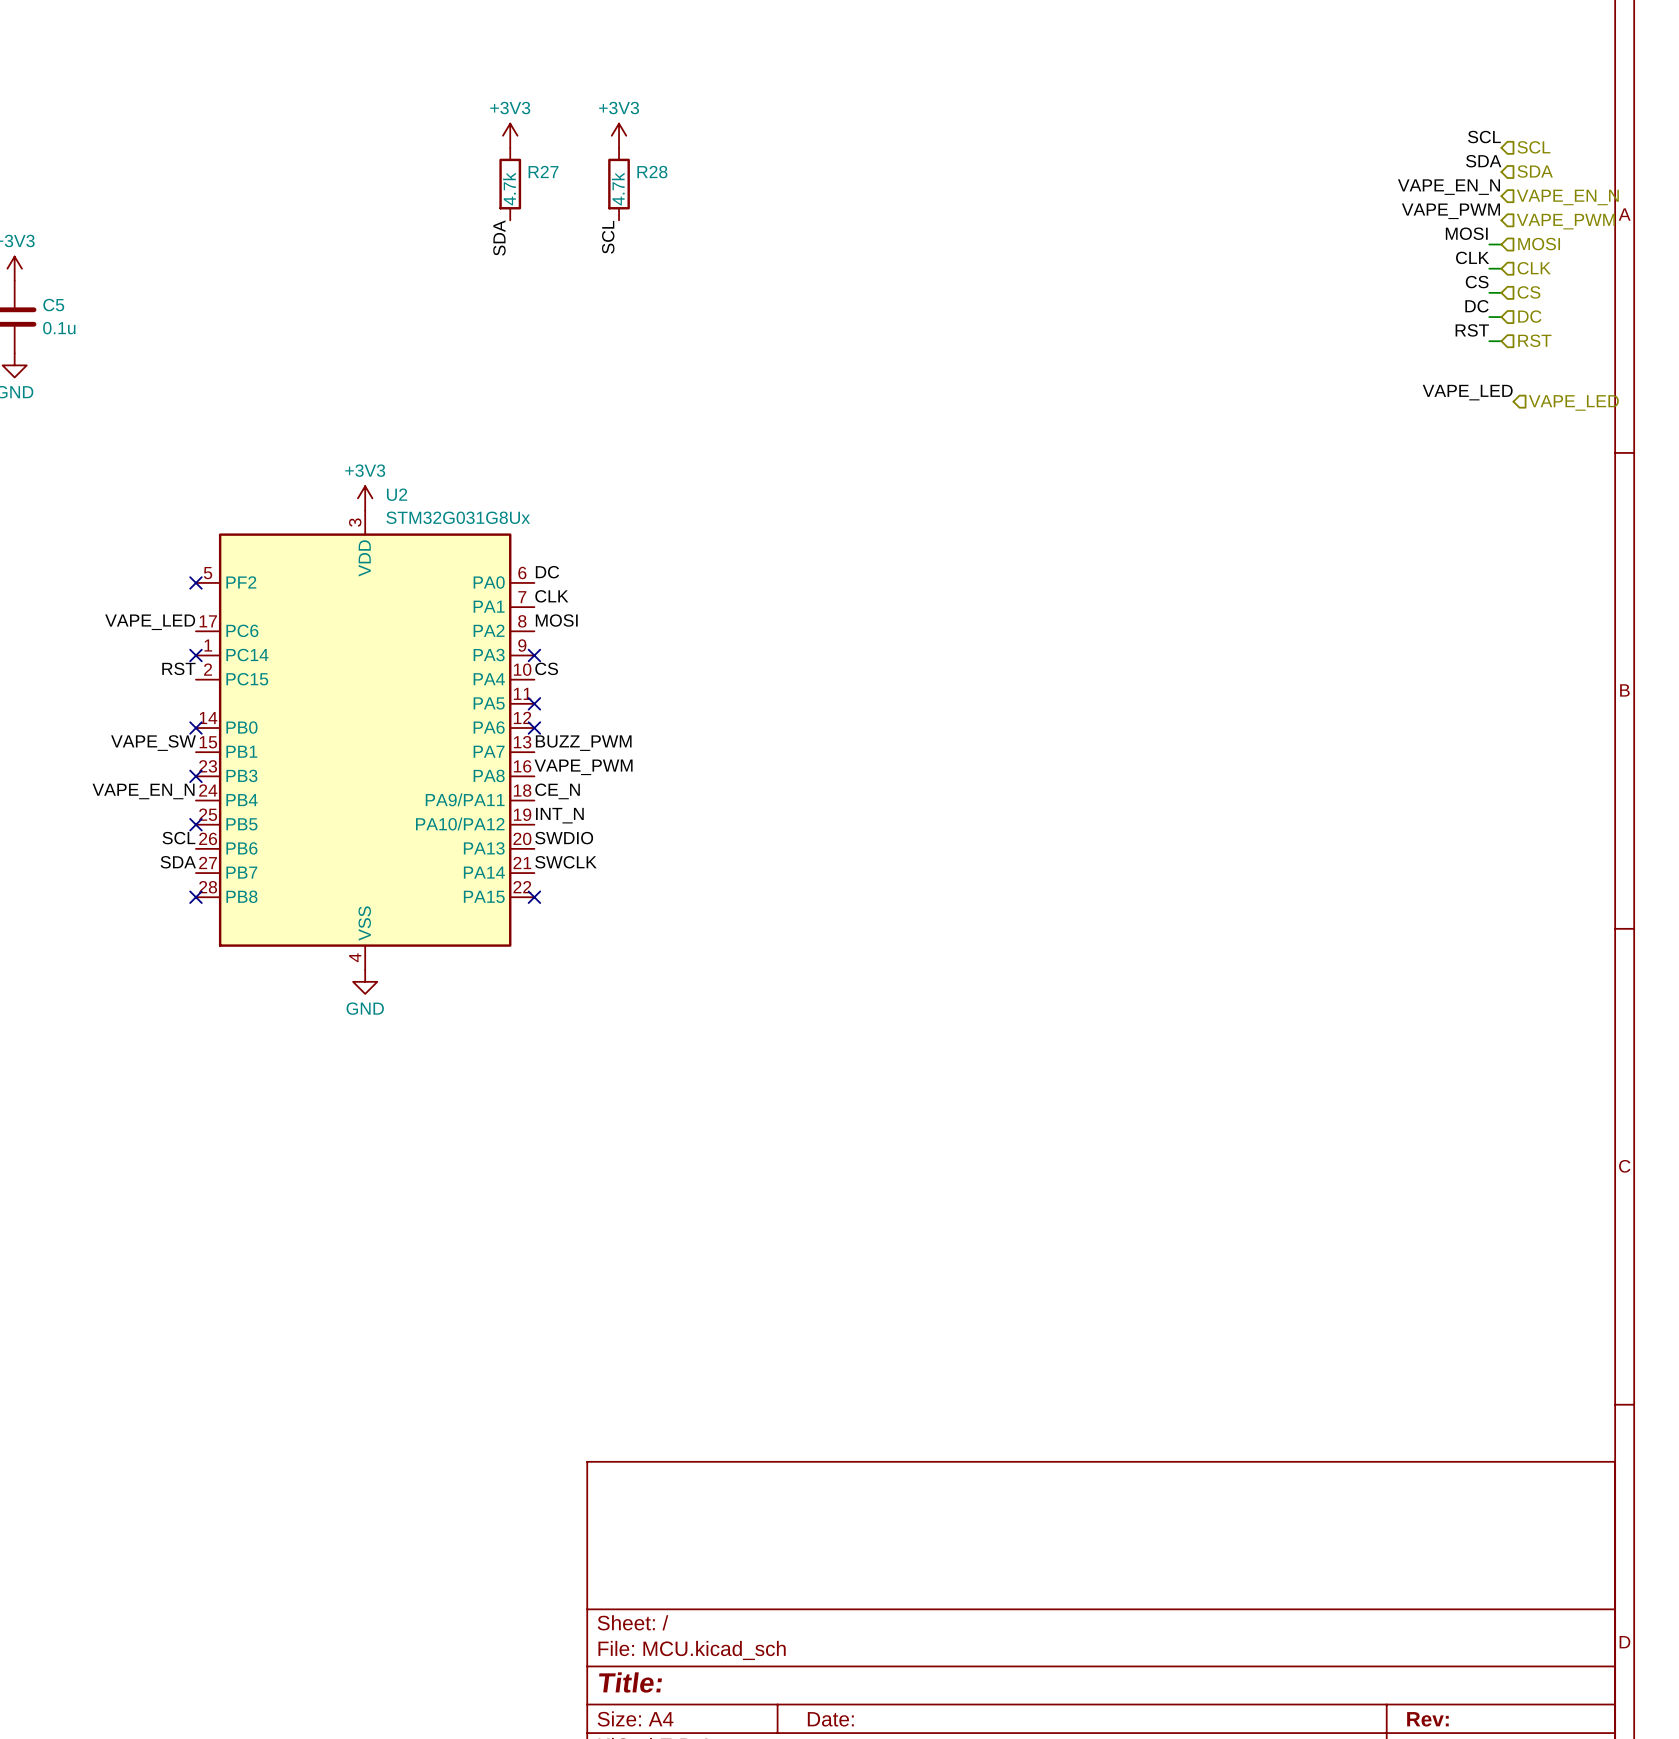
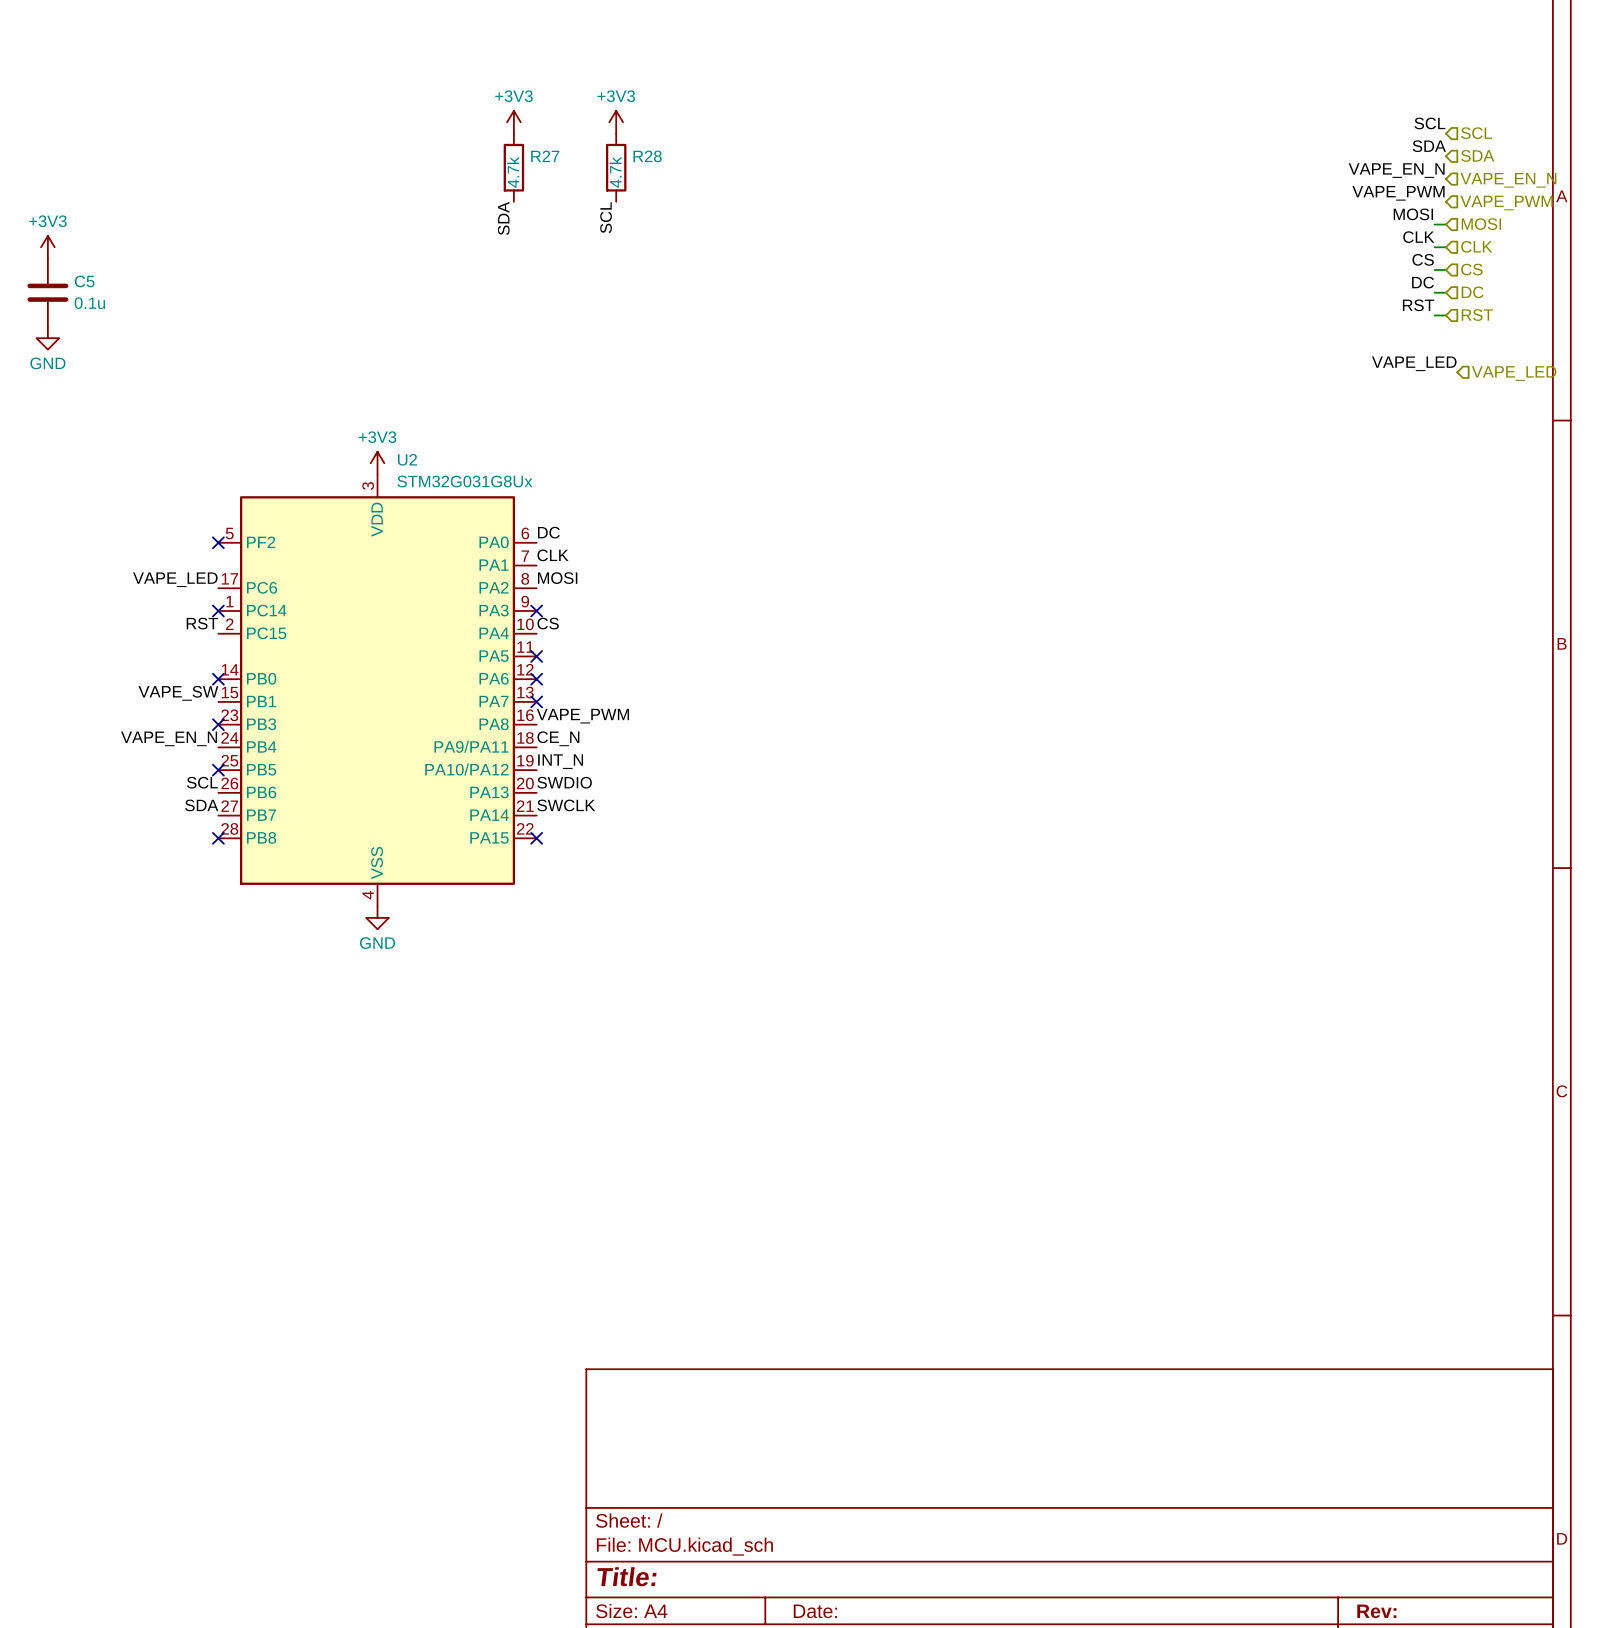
label: BUZZ_PWM (583, 743) -> none
no-connect mark: none -> (536, 701)

